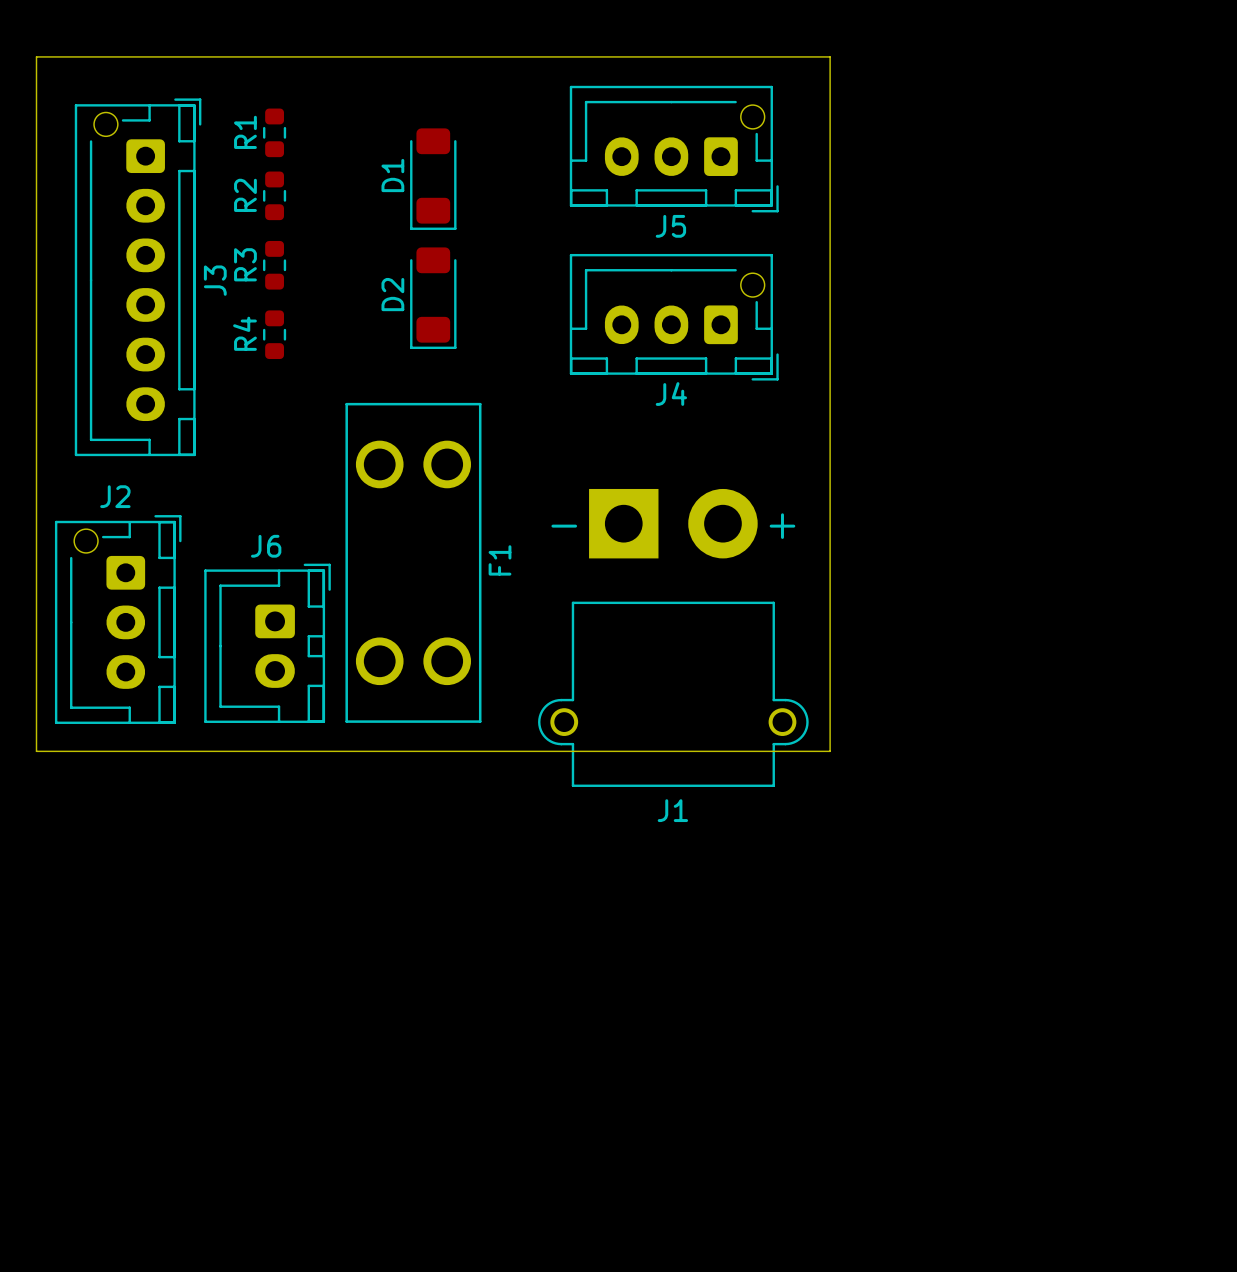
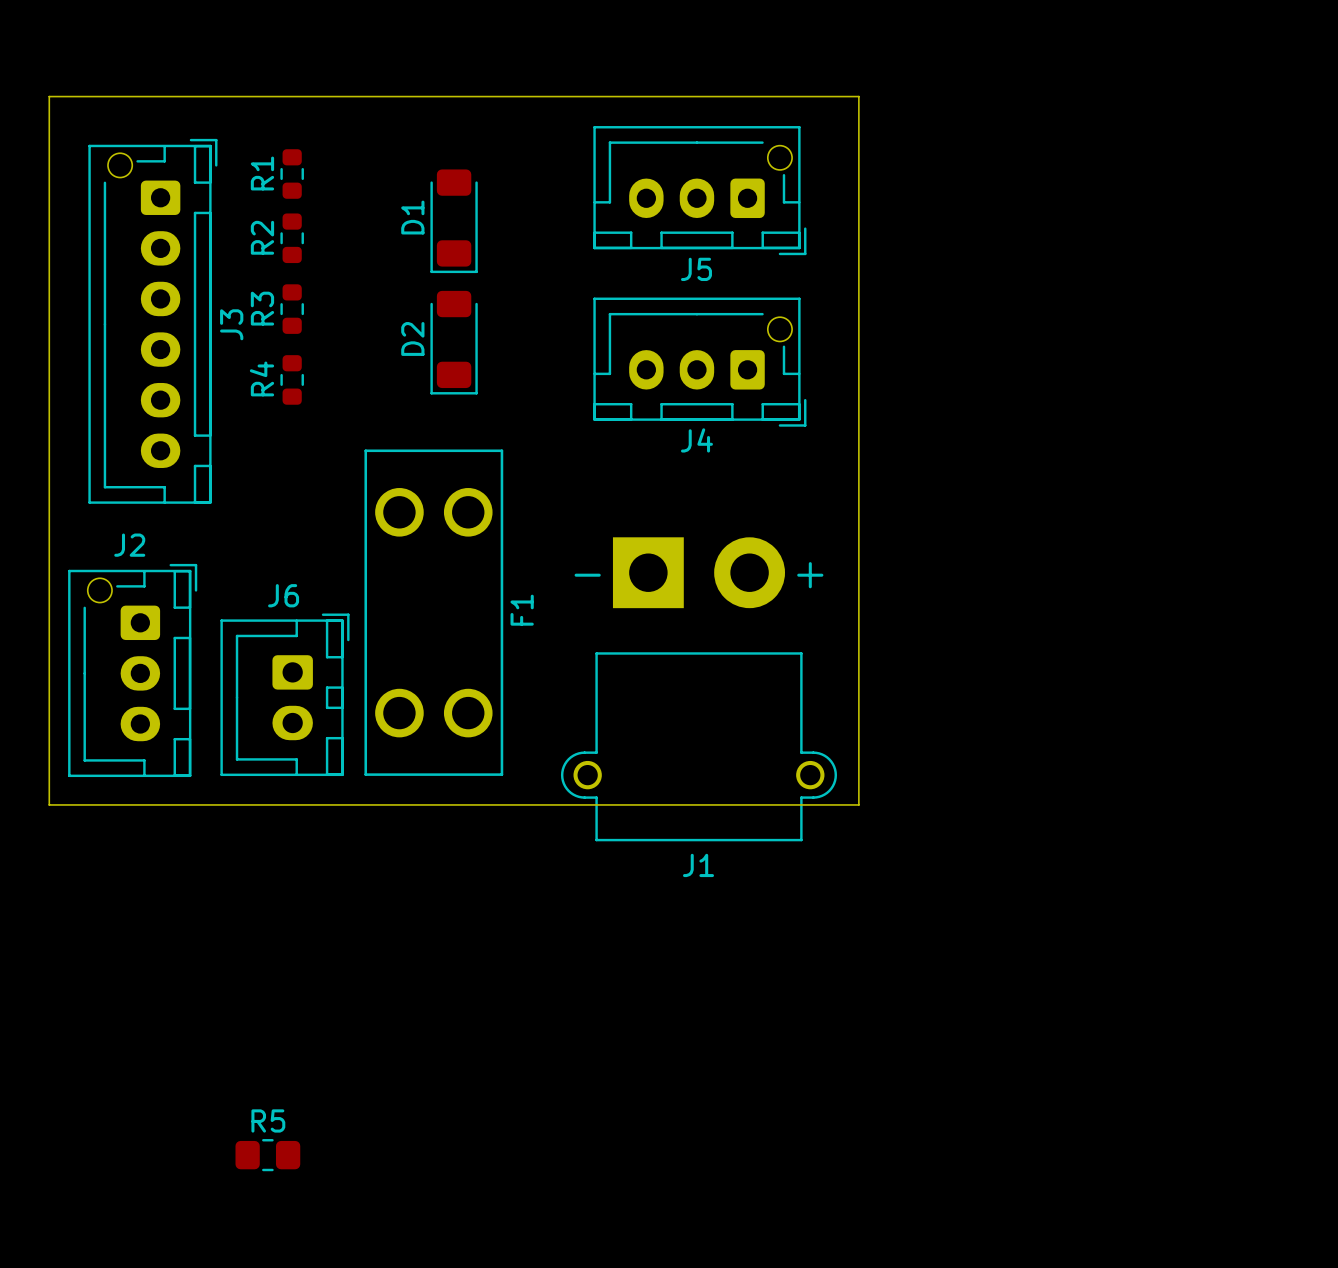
R5: none -> (267, 1155)

